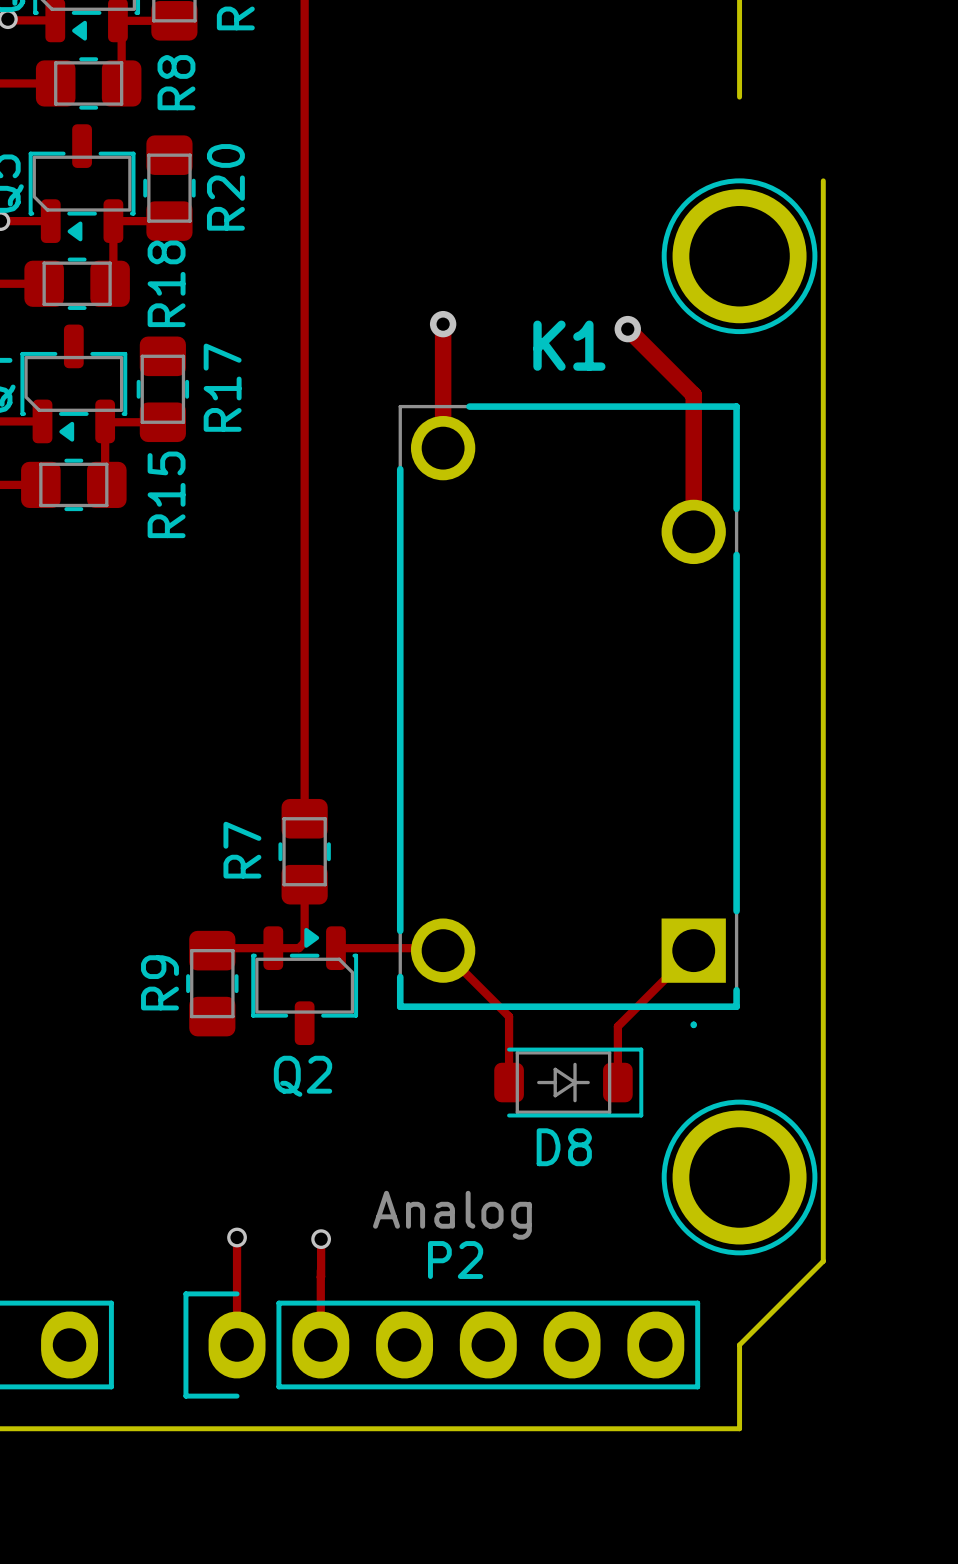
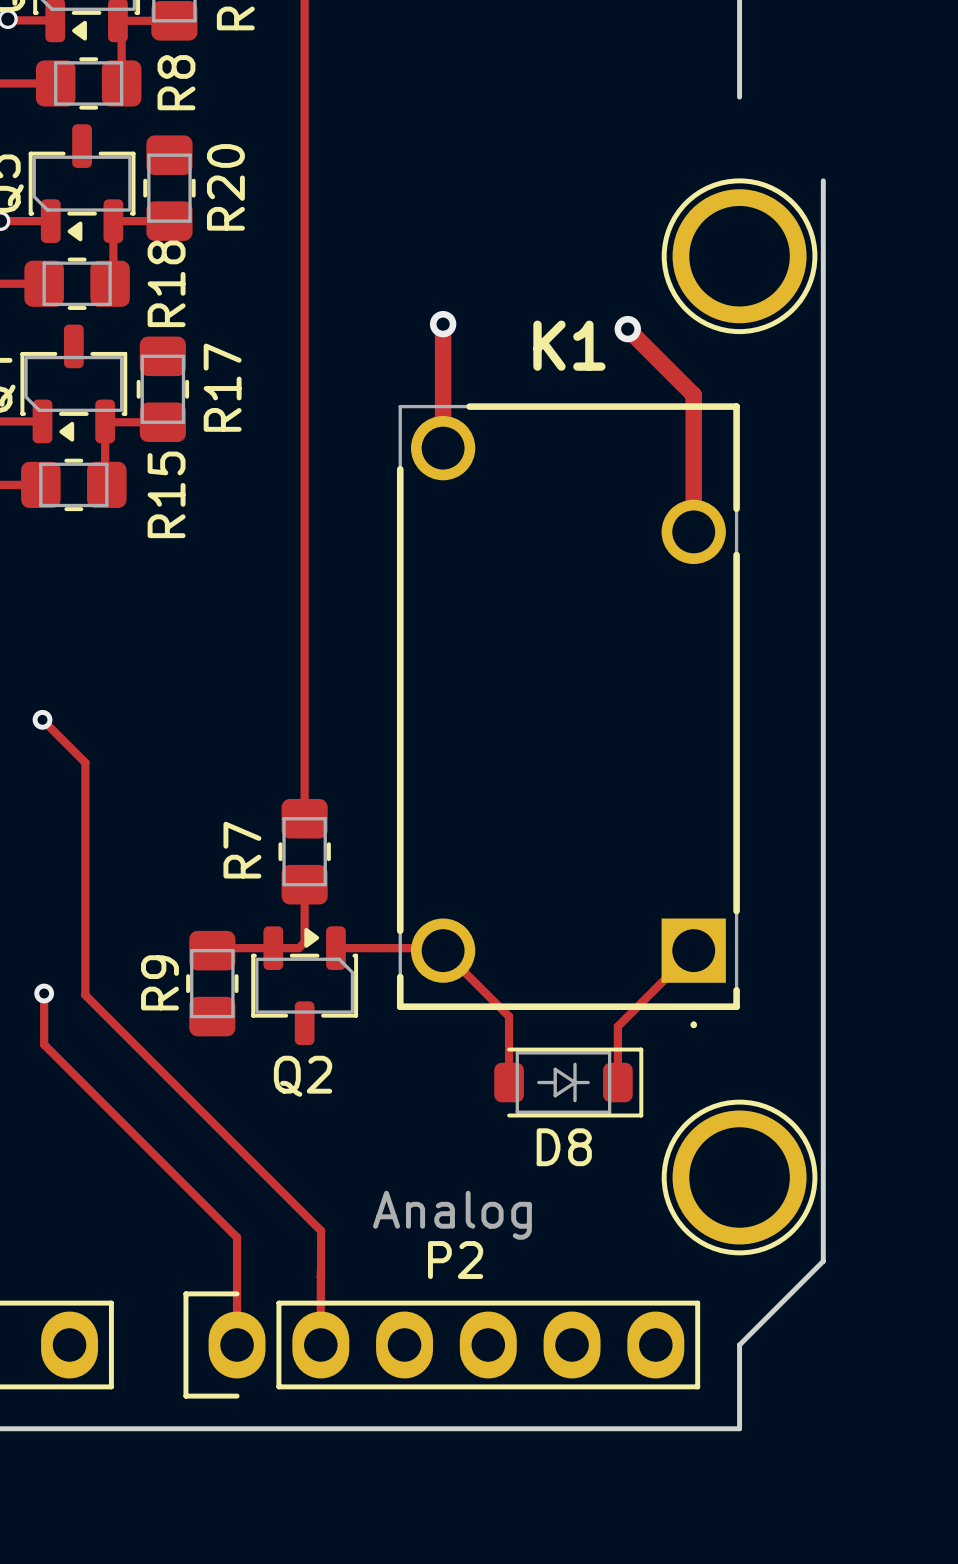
track: none -> (42, 719) (85, 762) (85, 995) (321, 1230) (321, 1239)
via: none -> (42, 719)
track: none -> (44, 993) (44, 1044) (237, 1237)
via: none -> (44, 993)
via: (237, 1237) -> none
via: (321, 1239) -> none

